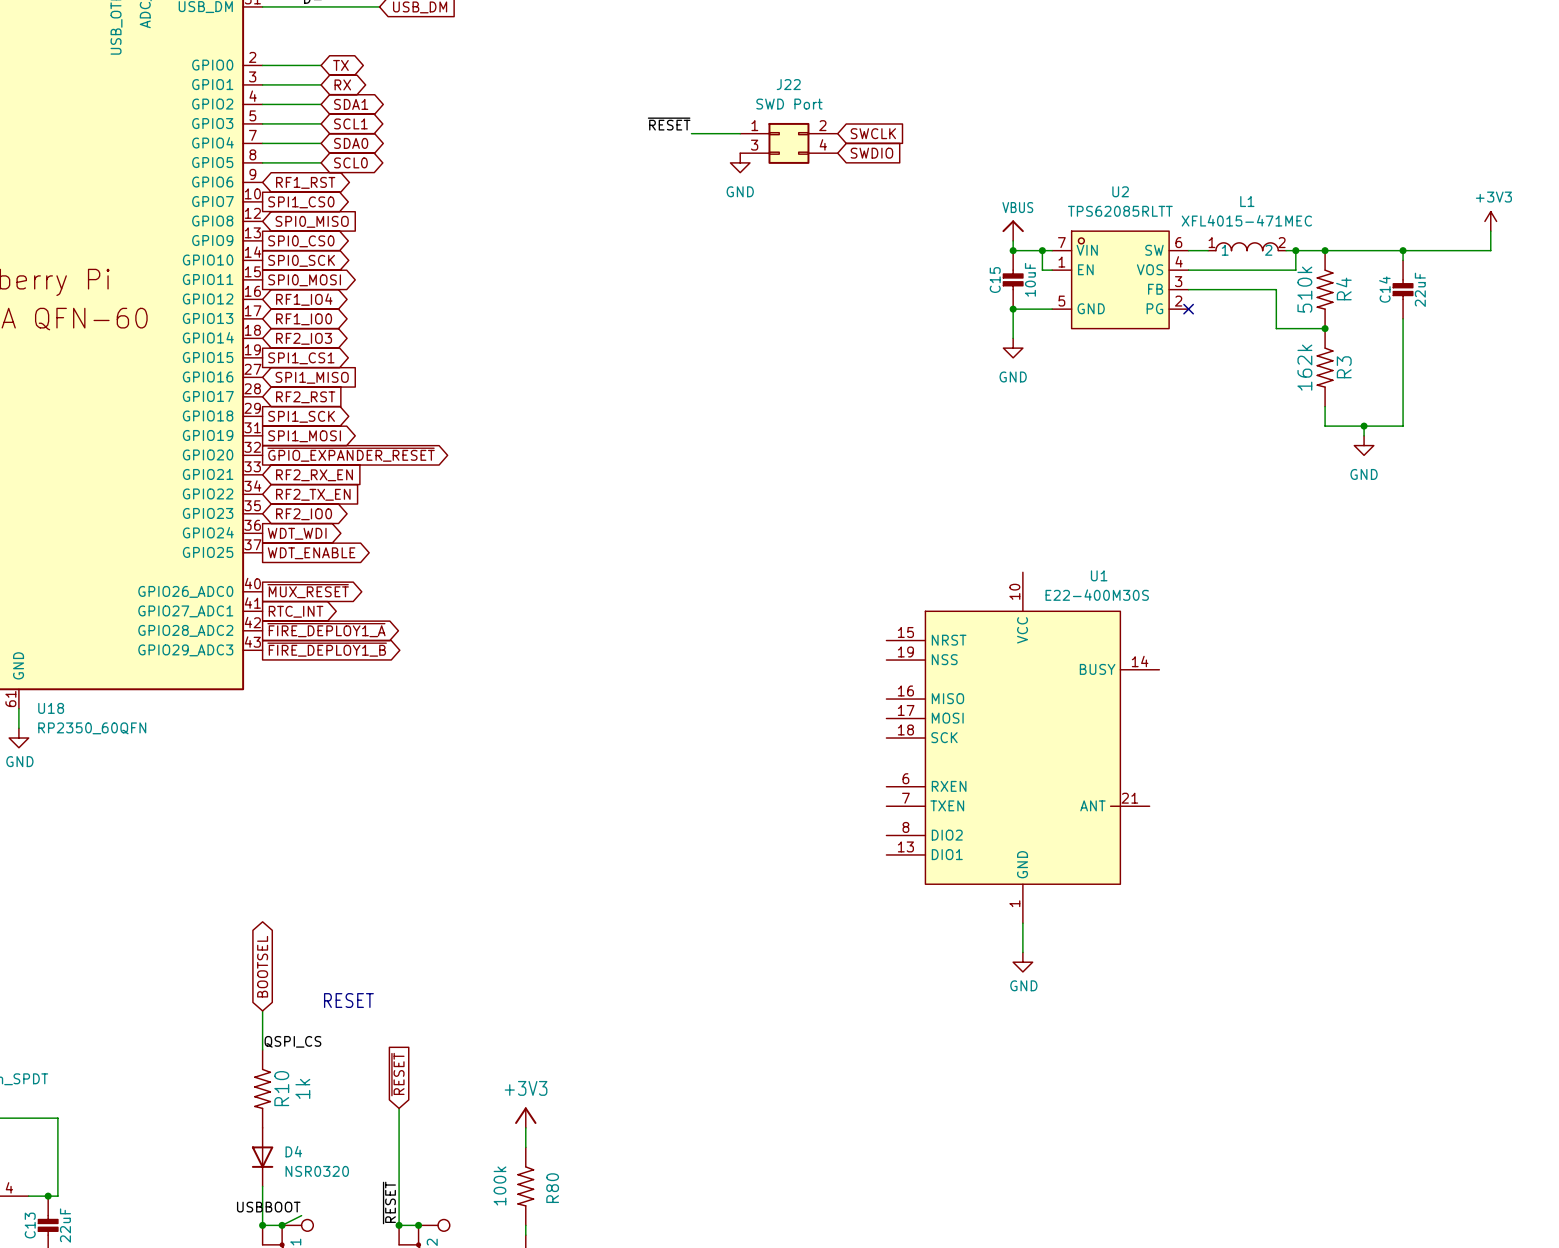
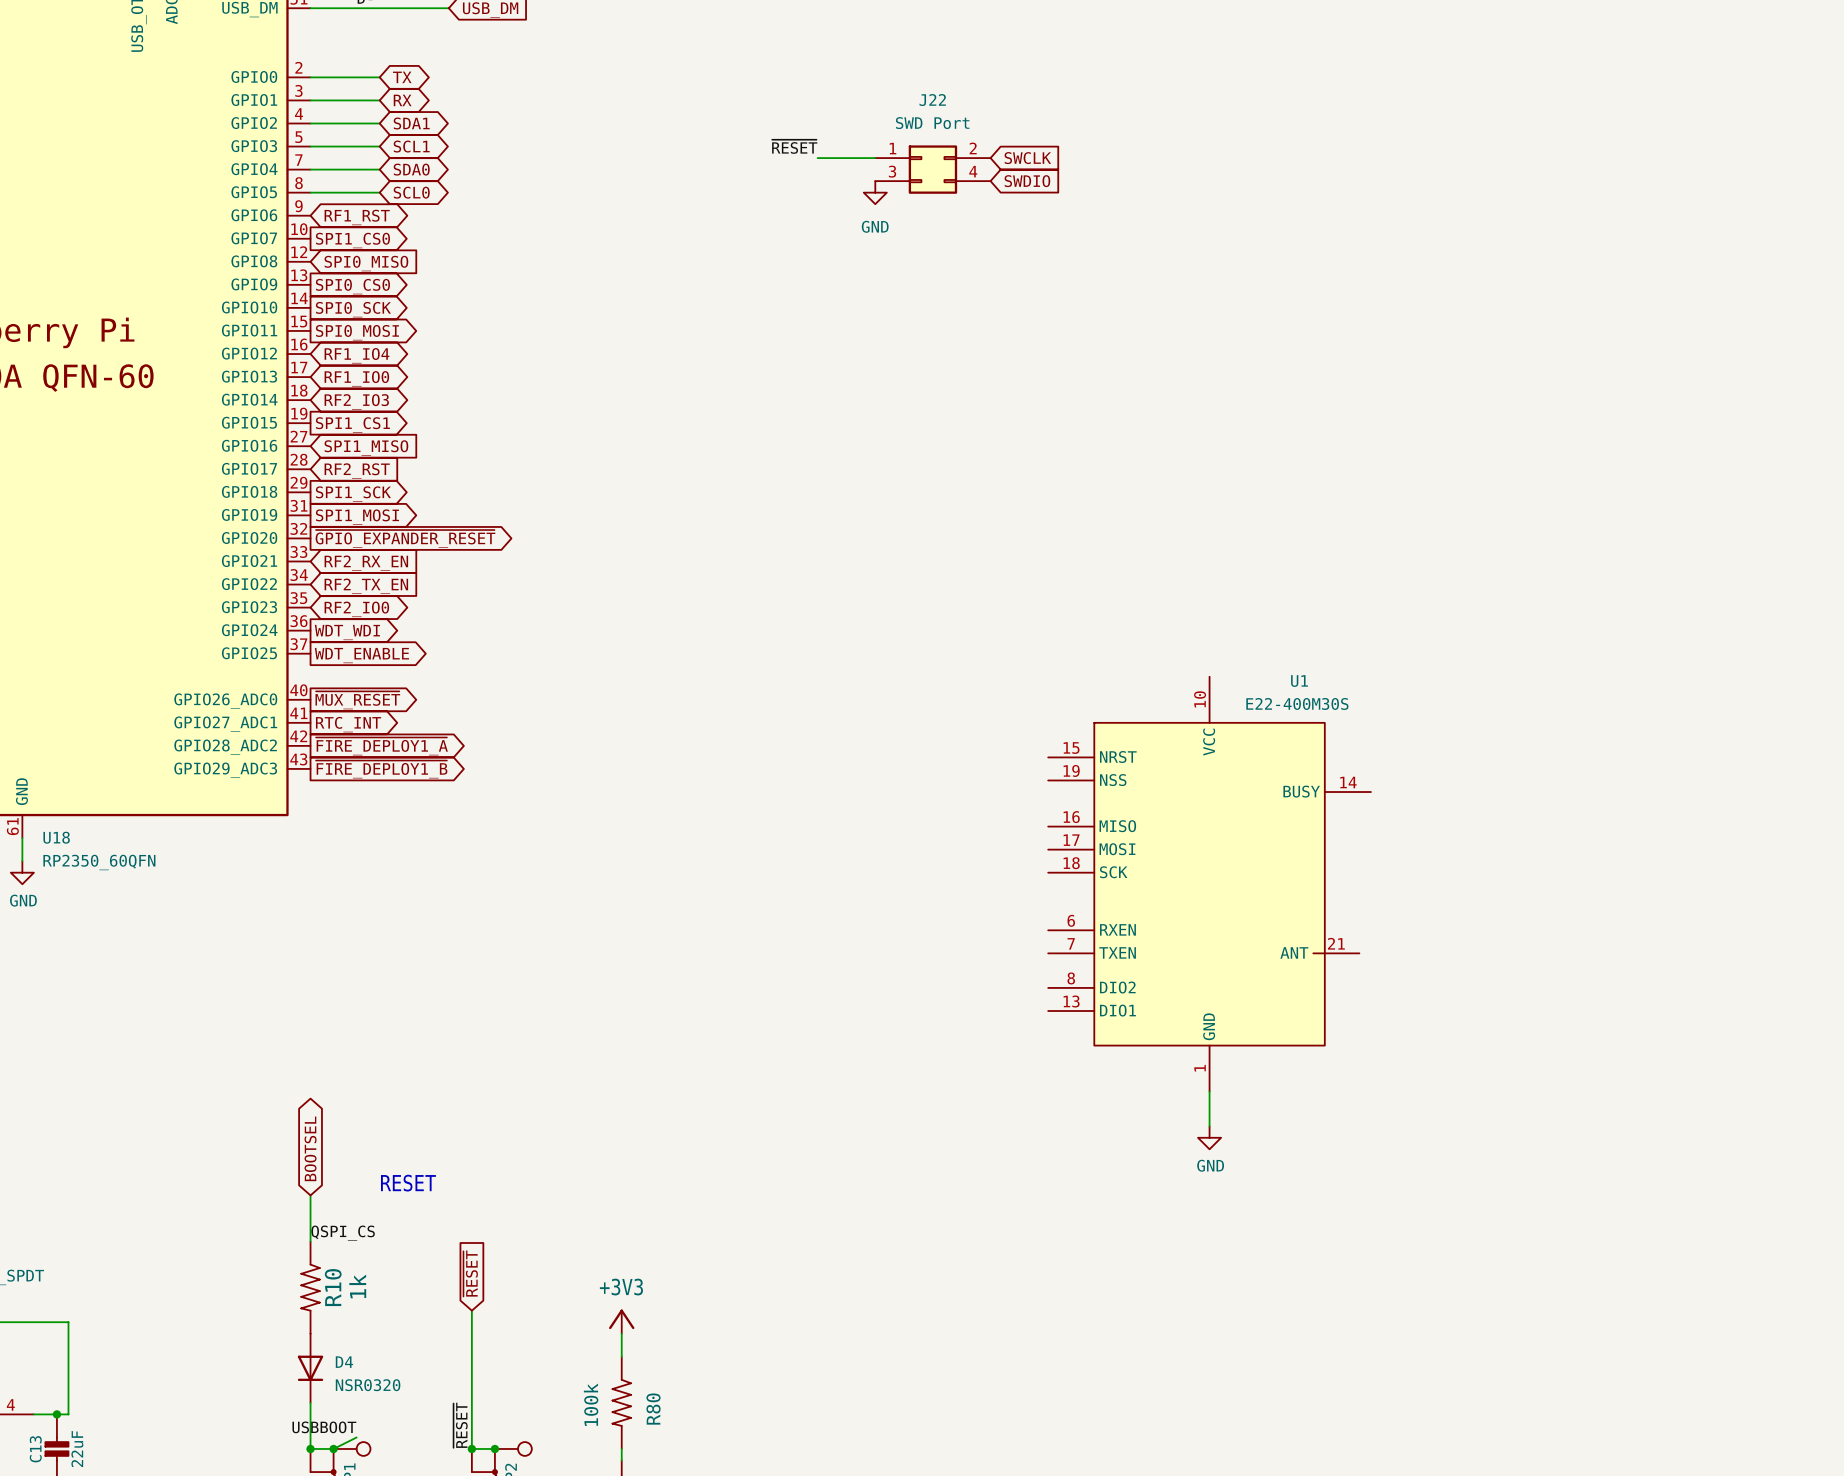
power symbol: +3V3 (1490, 221) -> none
power symbol: VBUS (1013, 230) -> none
wire: (1490, 231) (1490, 250) (1286, 250) -> none
wire: (1013, 240) (1013, 250) (1052, 250) -> none
L1: XFL4015-471MEC (1247, 246) -> none
junction: (1013, 250) -> none
wire: (1042, 250) (1042, 270) (1052, 270) -> none
junction: (1042, 250) -> none
wire: (1188, 250) (1208, 250) -> none
wire: (1295, 250) (1295, 270) (1188, 270) -> none
junction: (1295, 250) -> none
junction: (1325, 250) -> none
wire: (1403, 250) (1403, 260) -> none
junction: (1403, 250) -> none
C15: 10uF (1013, 279) -> none
U2: TPS62085RLTT (1120, 279) -> none
wire: (1188, 289) (1276, 289) (1276, 328) (1325, 328) -> none
R4: 510k (1325, 289) -> none
C14: 22uF (1403, 289) -> none
junction: (1013, 309) -> none
wire: (1052, 309) (1013, 309) (1013, 338) -> none
no-connect mark: (1188, 309) -> none
wire: (1403, 318) (1403, 426) (1325, 426) (1325, 406) -> none
junction: (1325, 328) -> none
power symbol: GND (1013, 348) -> none
R3: 162k (1325, 367) -> none
wire: (1364, 426) (1364, 435) -> none
junction: (1364, 426) -> none
power symbol: GND (1364, 445) -> none

